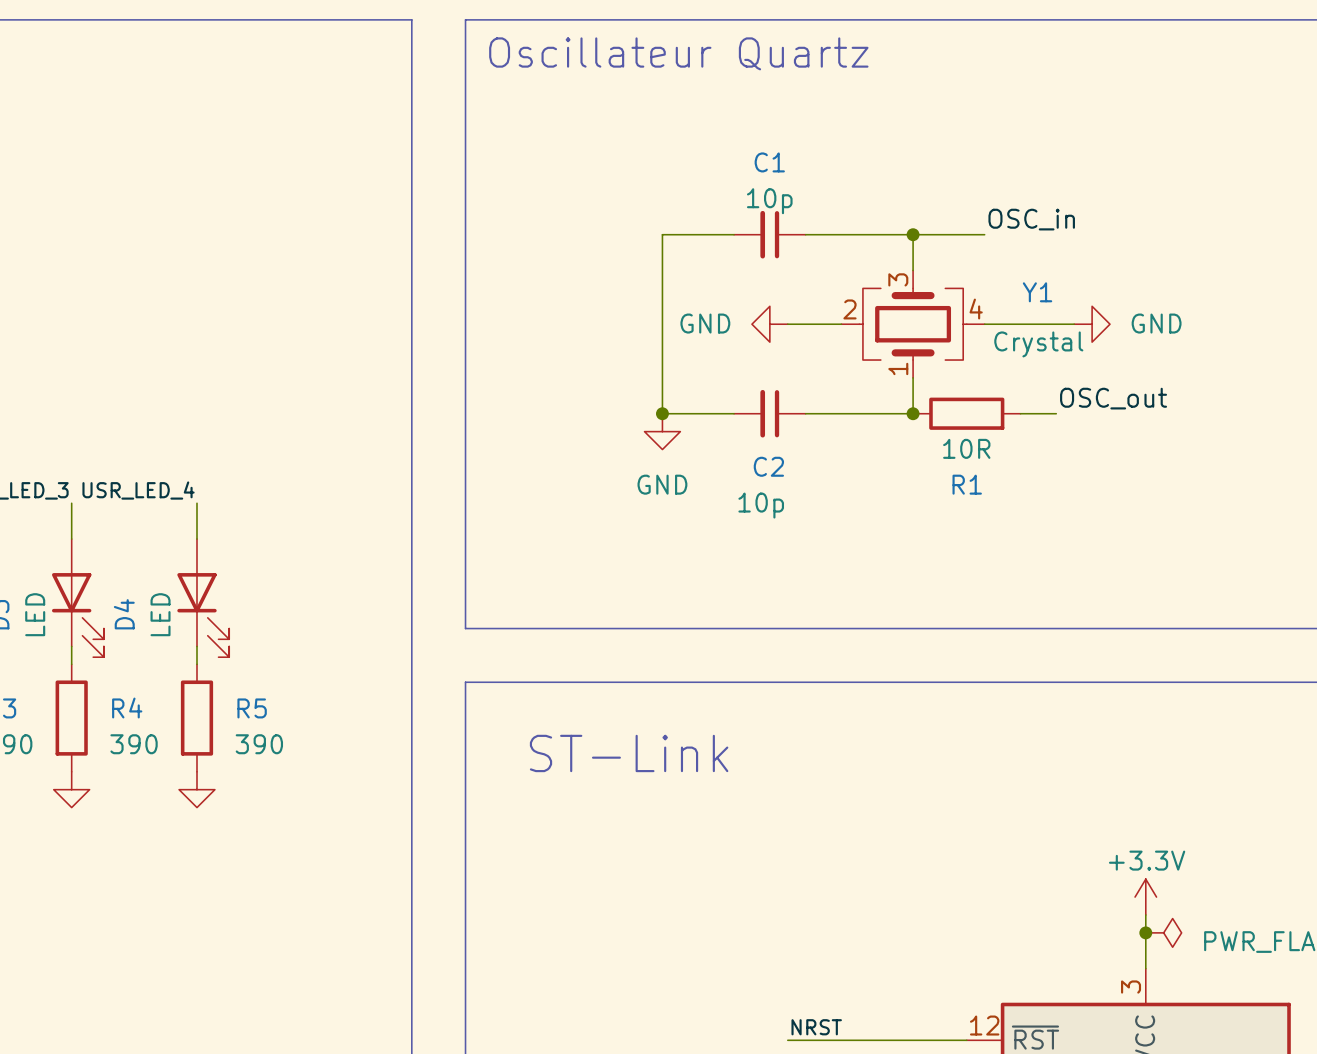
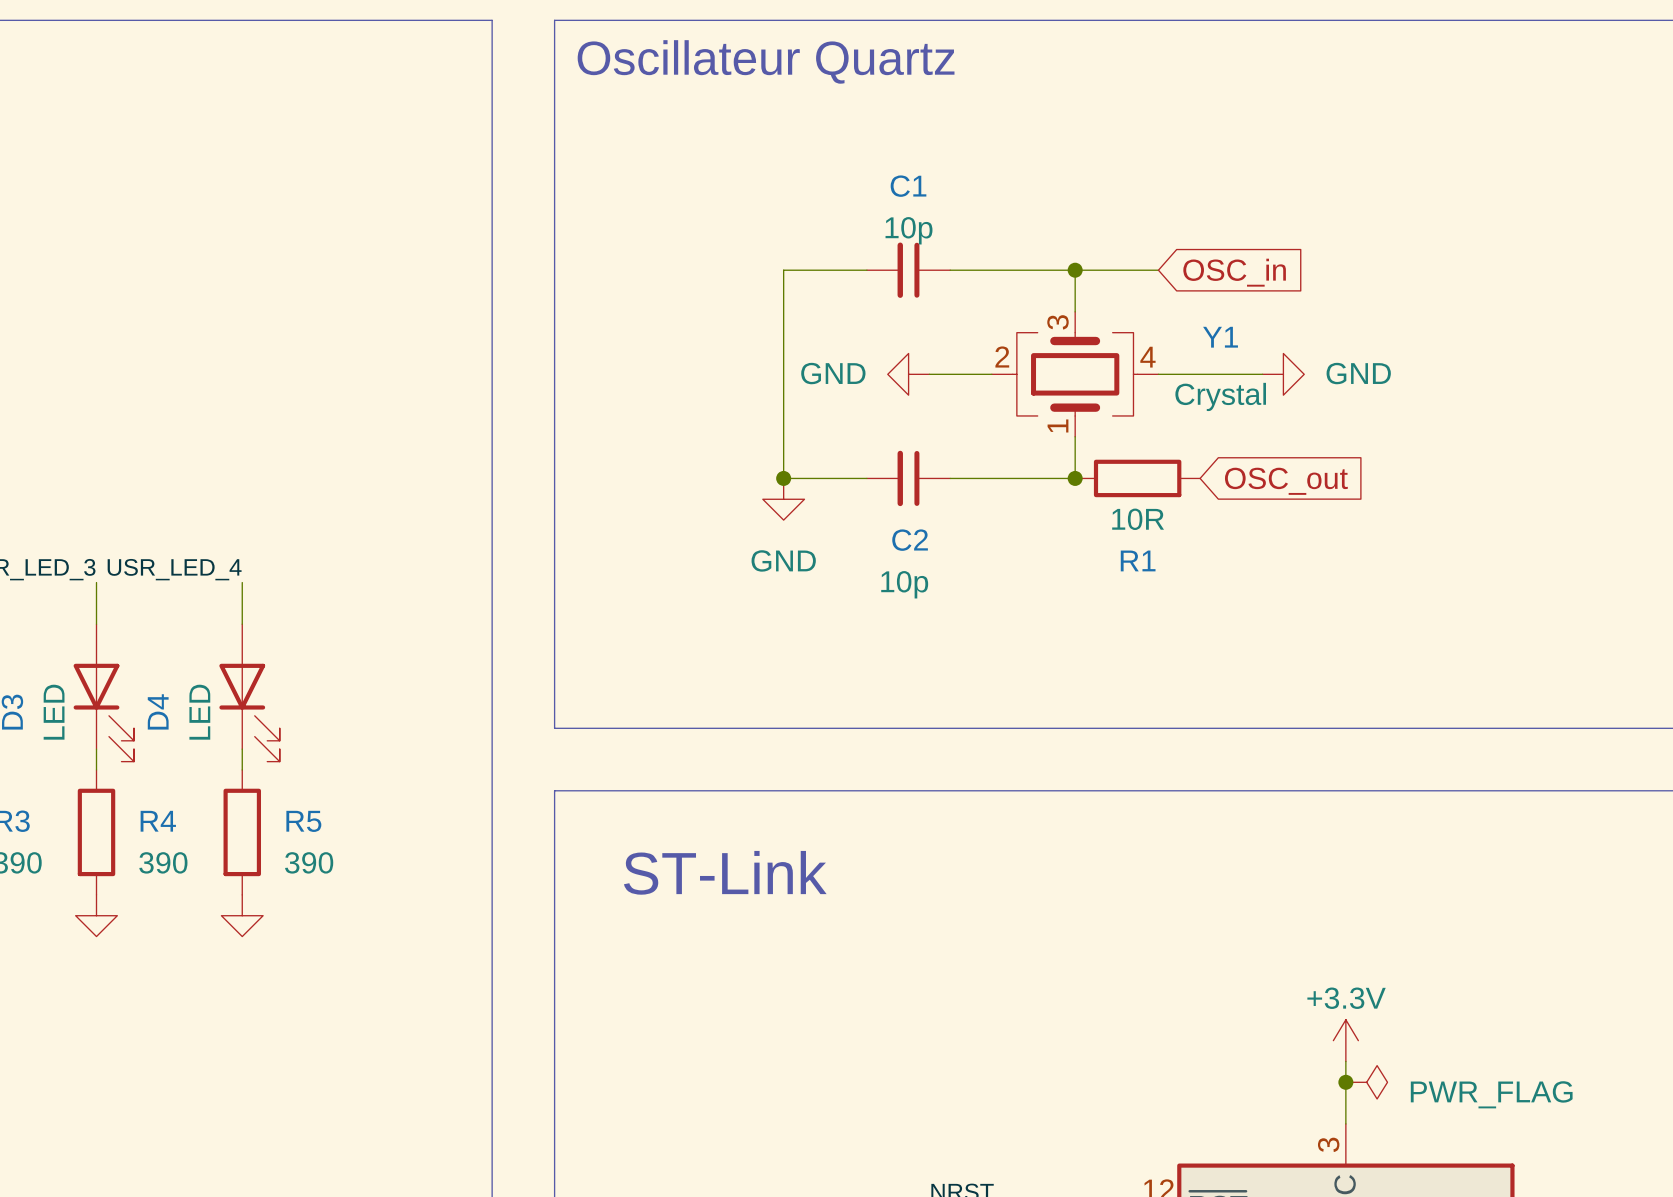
label: OSC_in (1031, 219) -> none
global label: none -> OSC_in (1234, 272)
label: OSC_out (1113, 398) -> none
wire: (1020, 413) (1056, 413) -> none
global label: none -> OSC_out (1286, 481)

